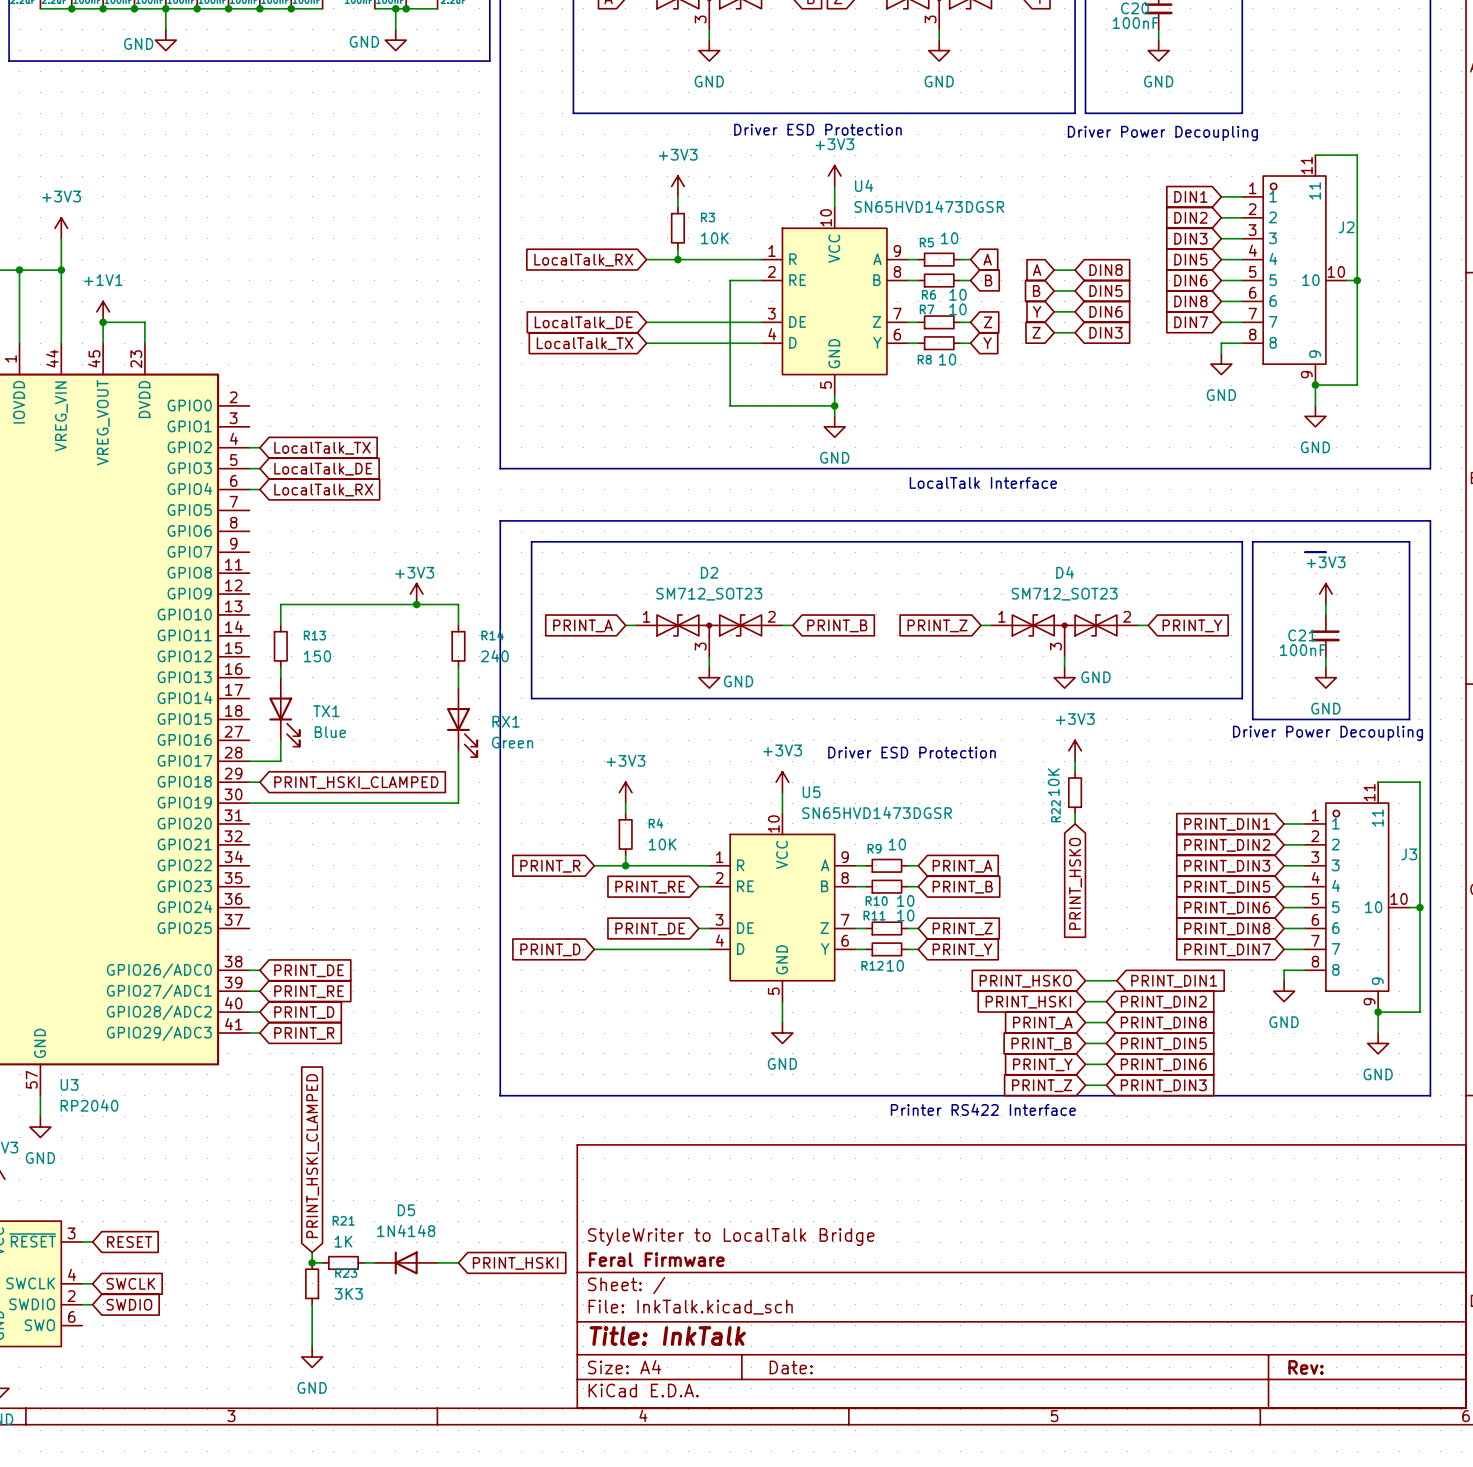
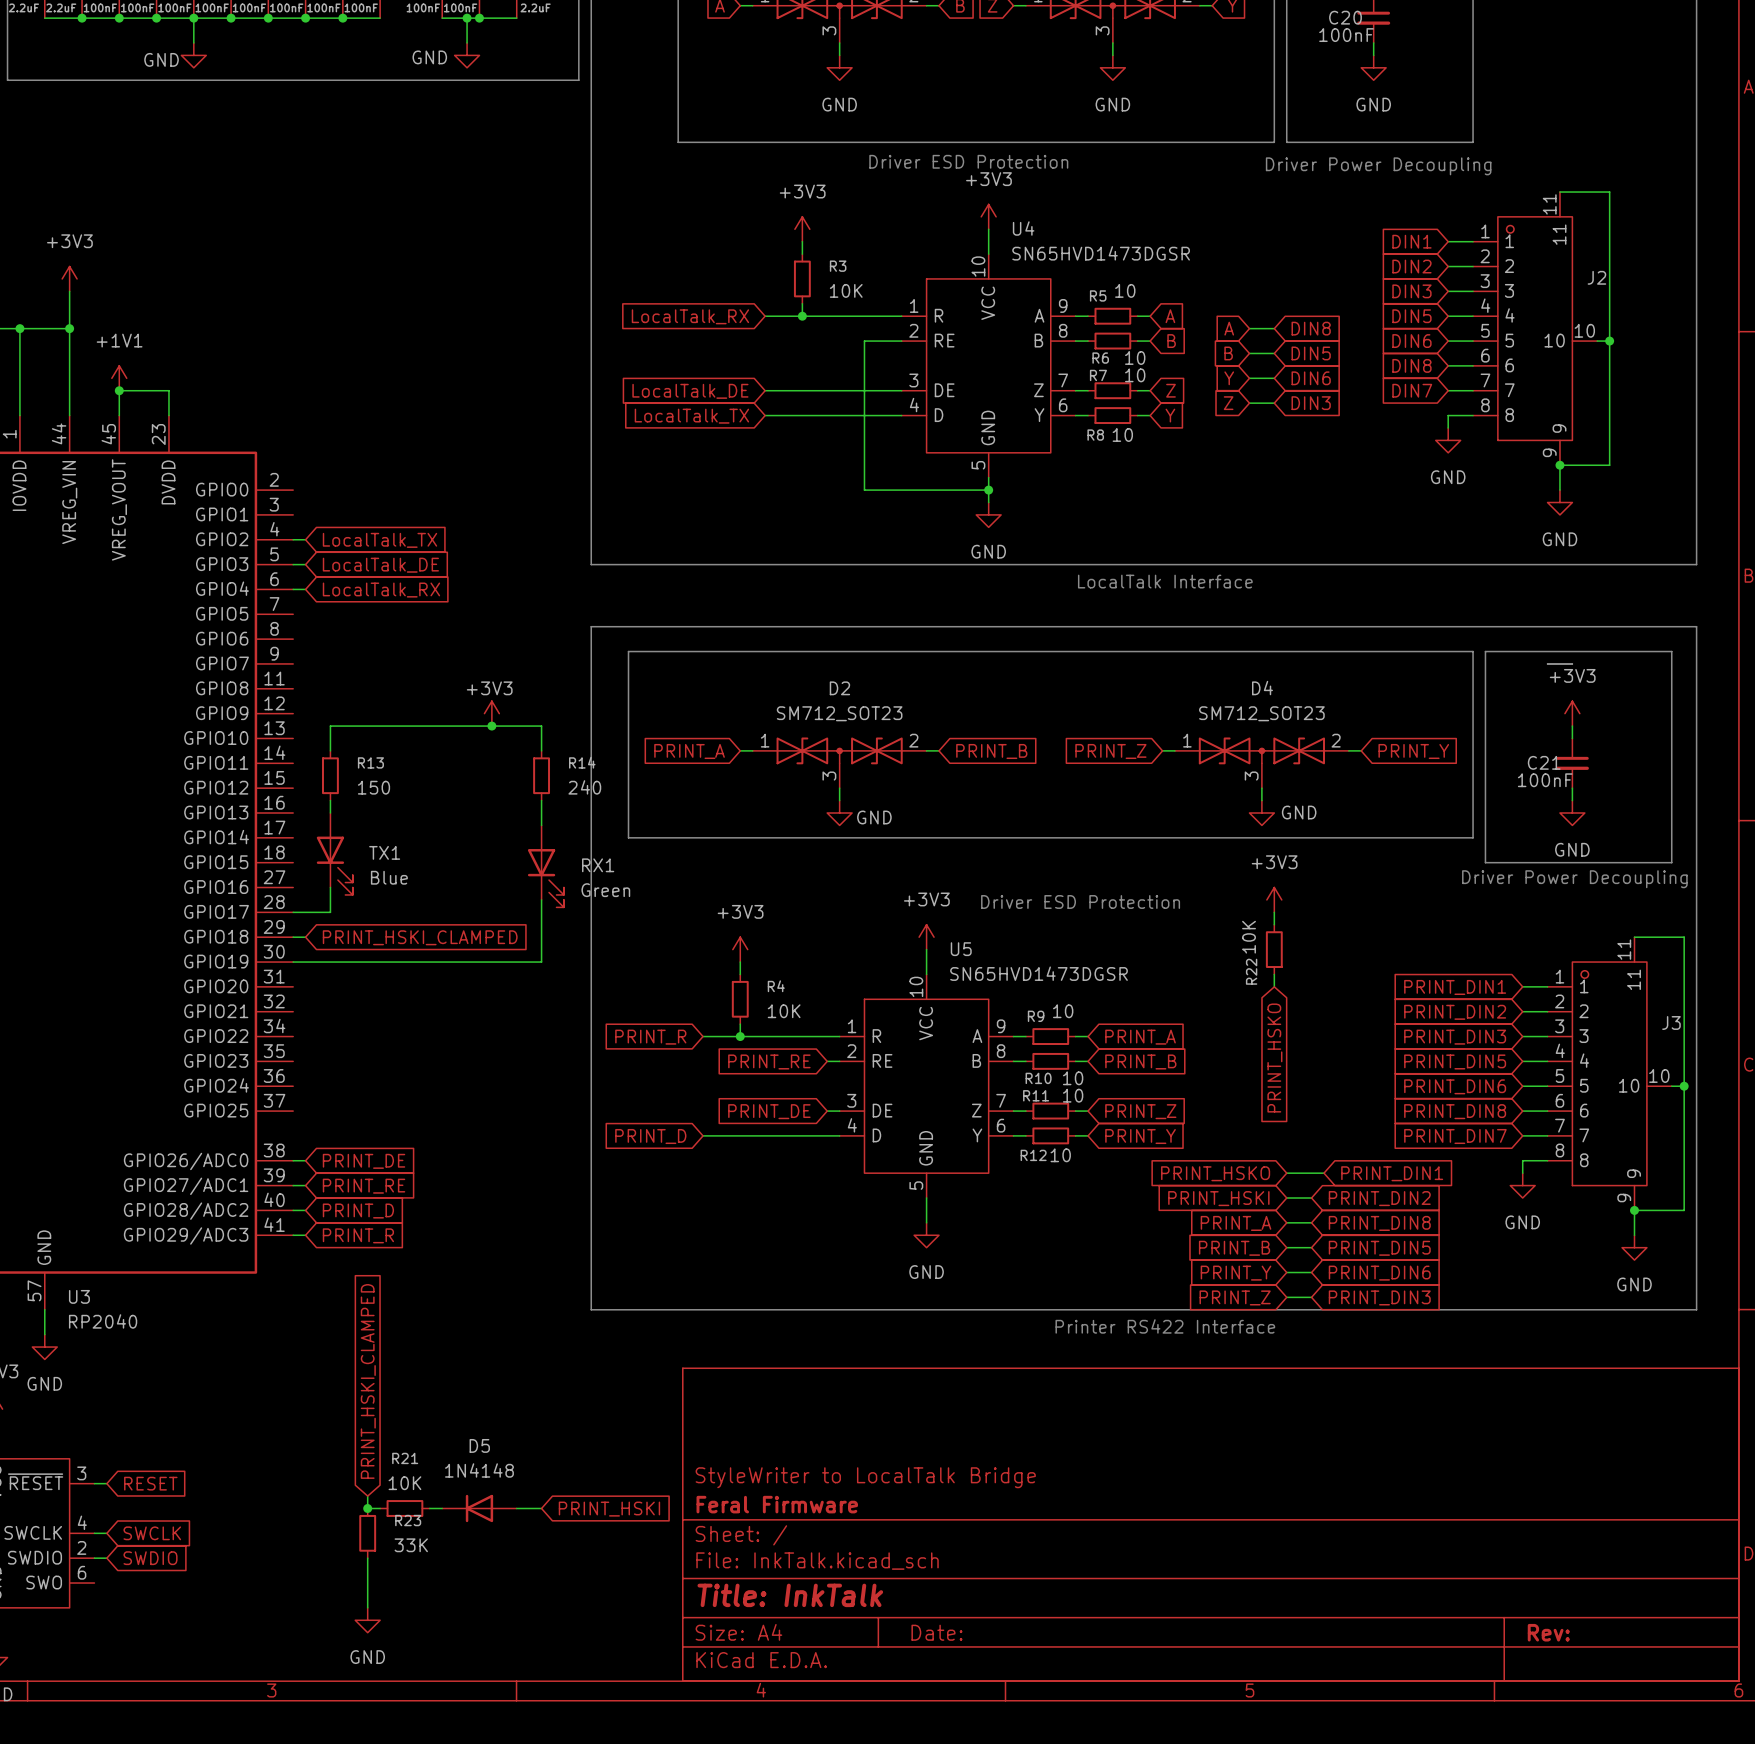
R21 value: 1K (343, 1241) -> 10K (404, 1483)
R23 value: 3K3 (348, 1293) -> 33K (411, 1545)

